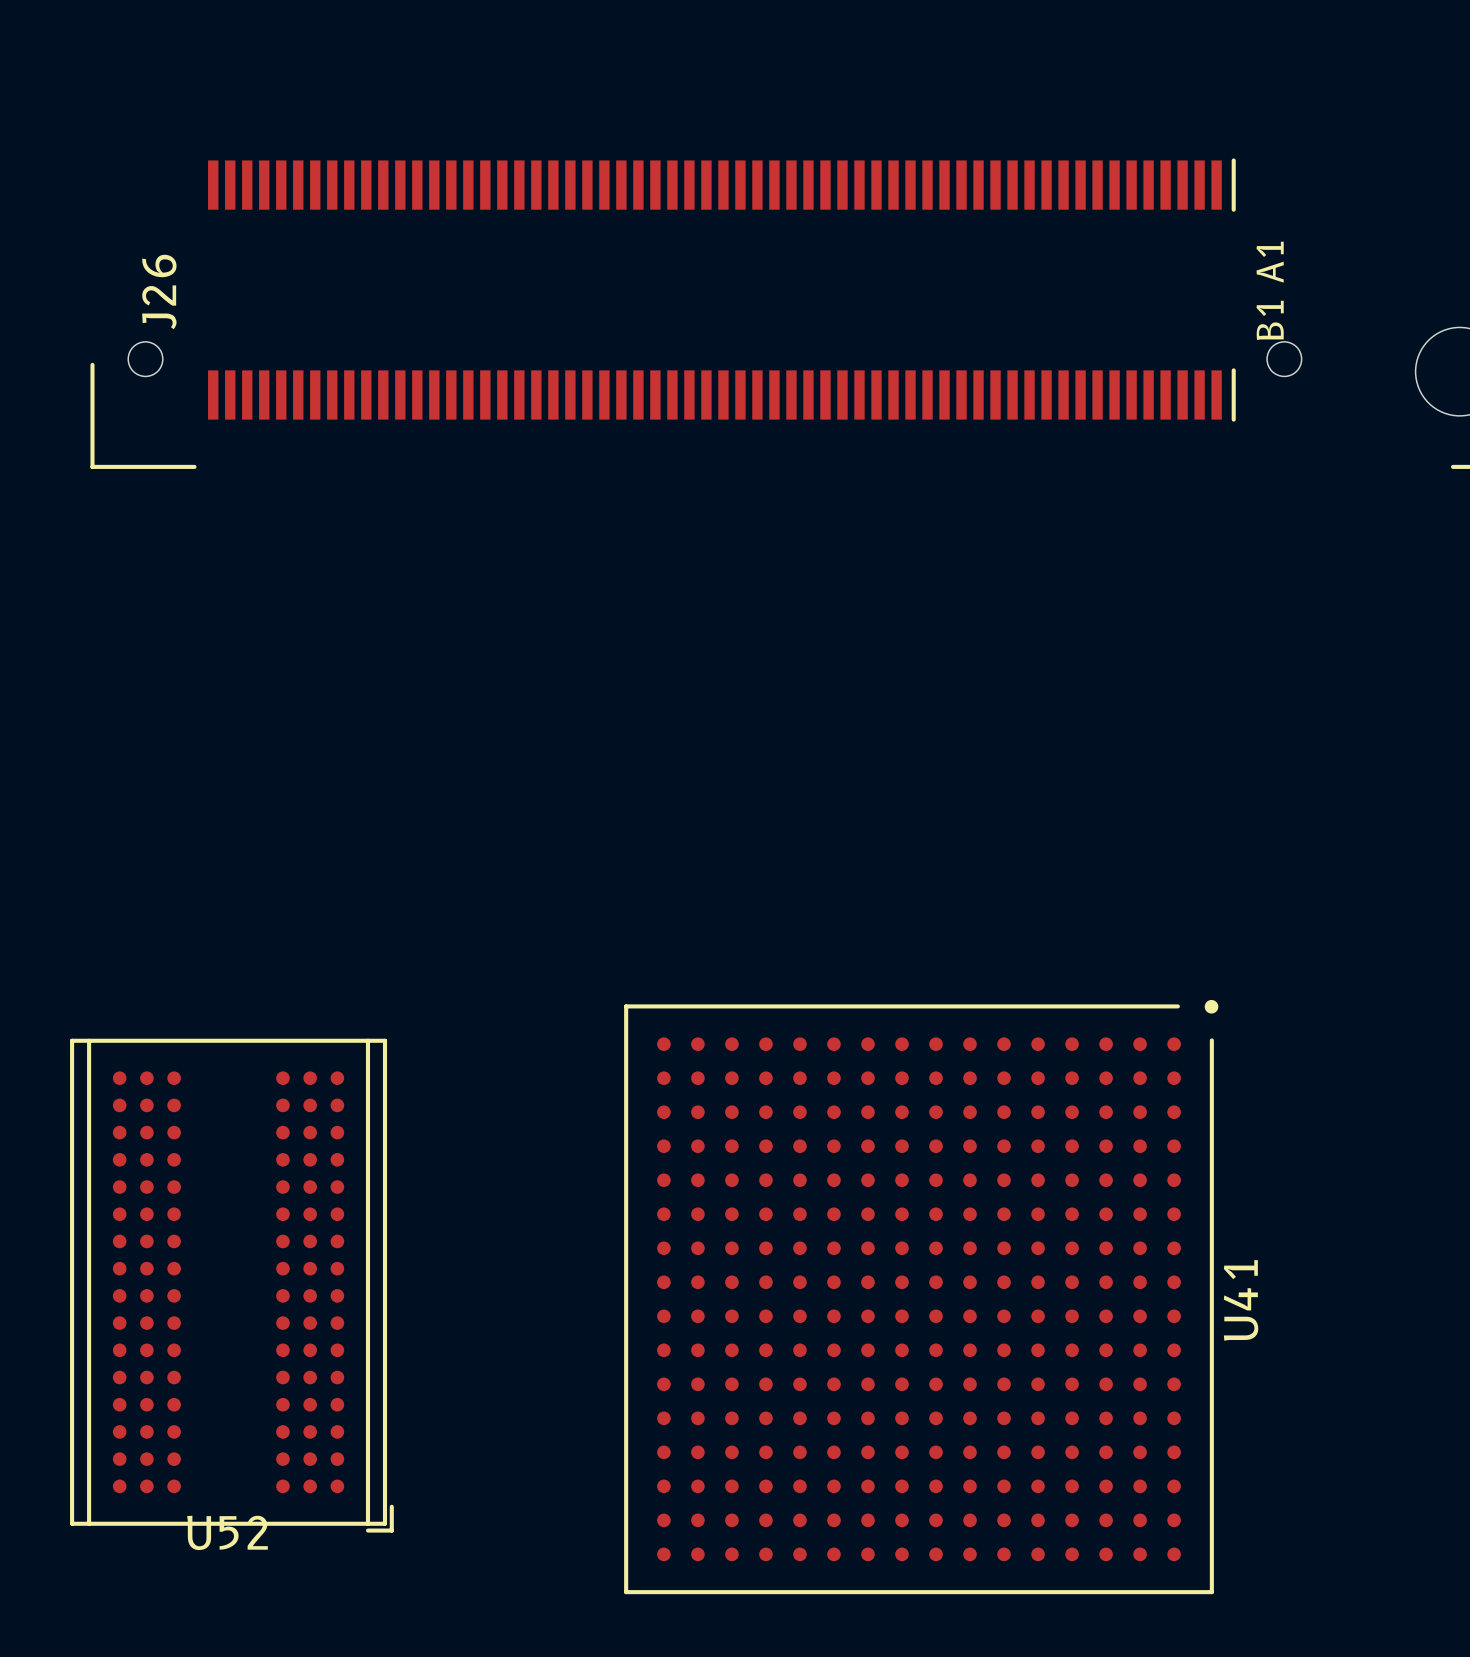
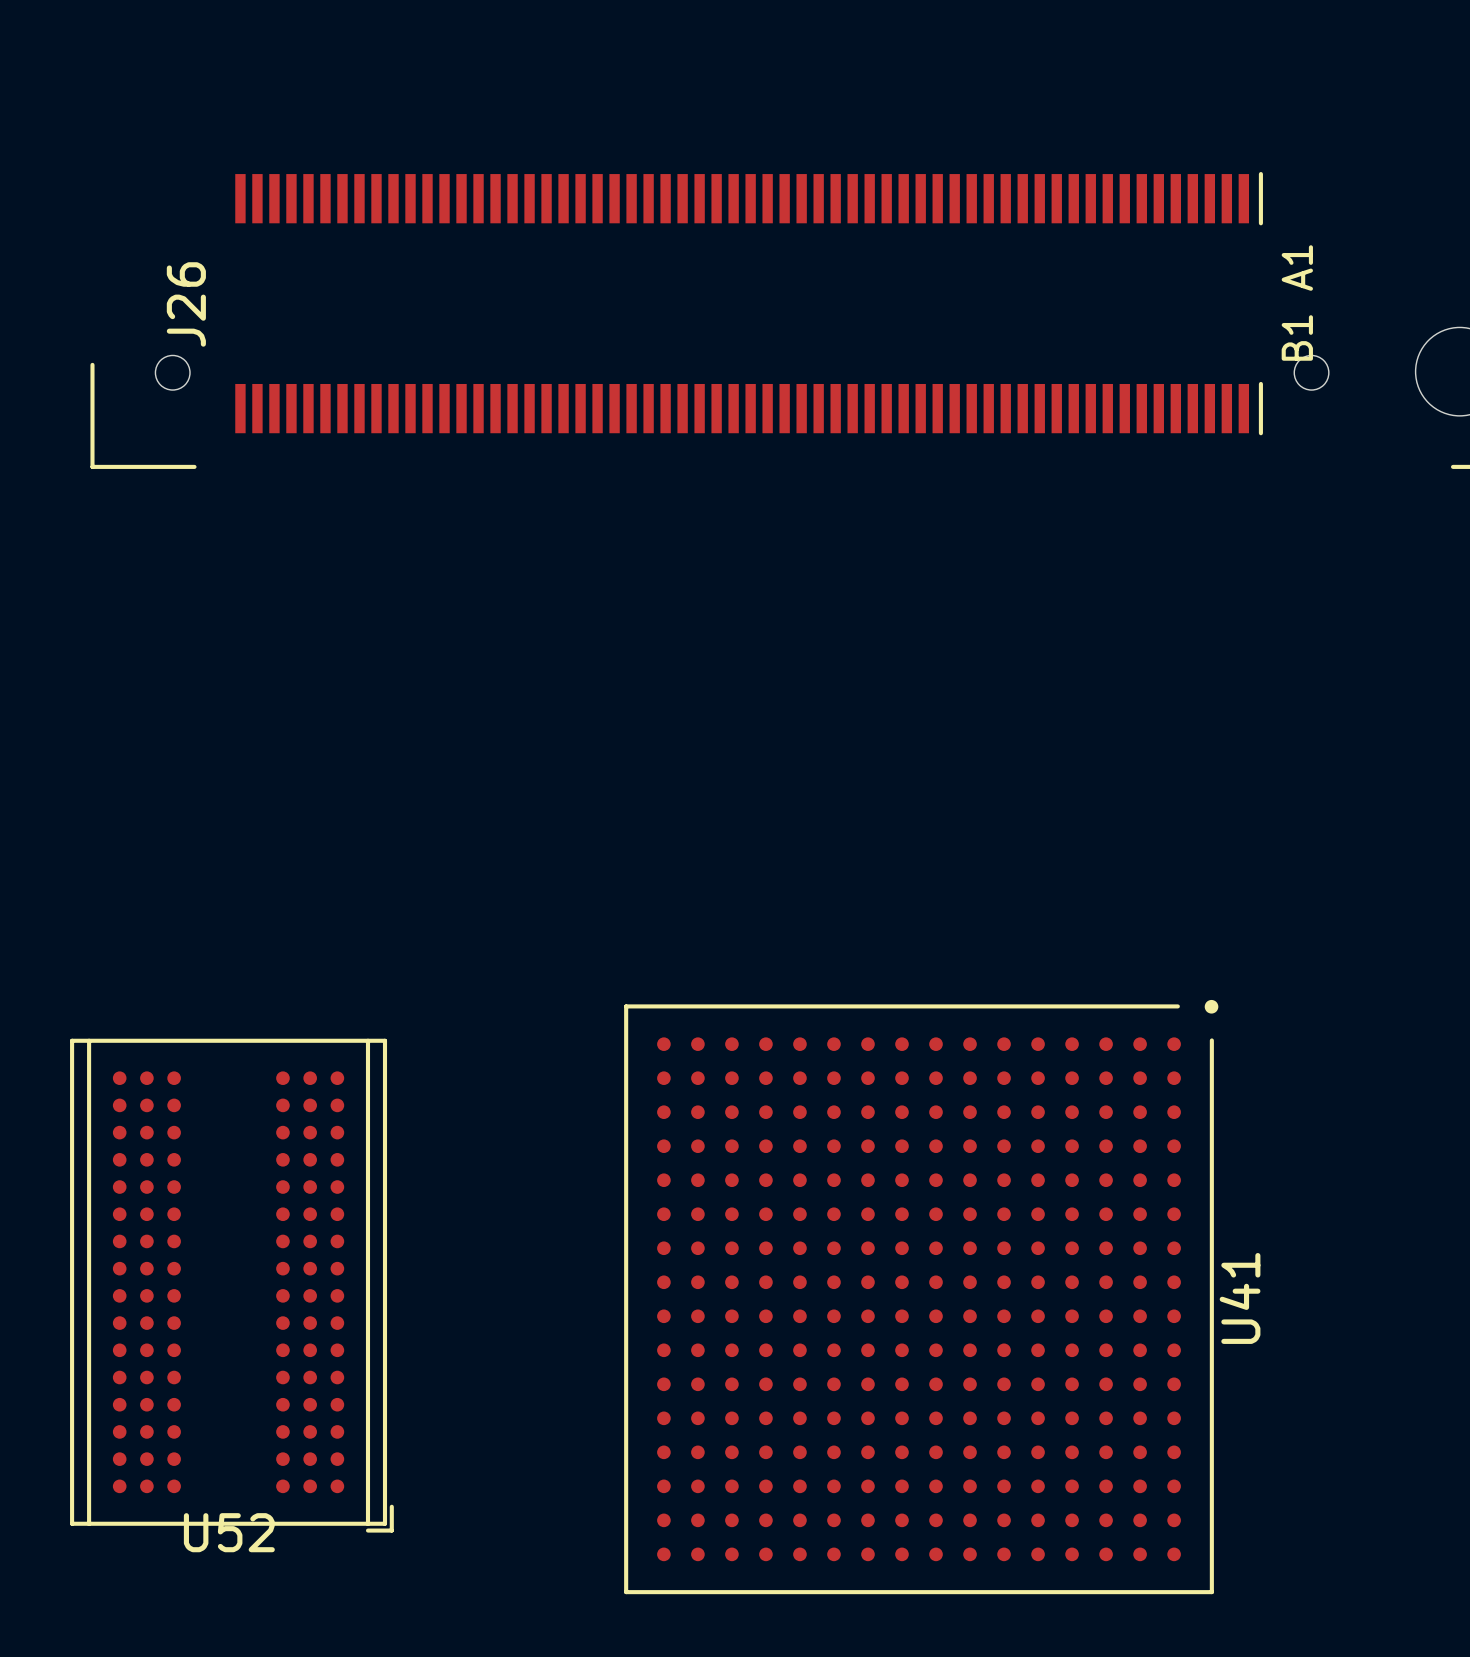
J26 position: (714, 290) -> (742, 303)

